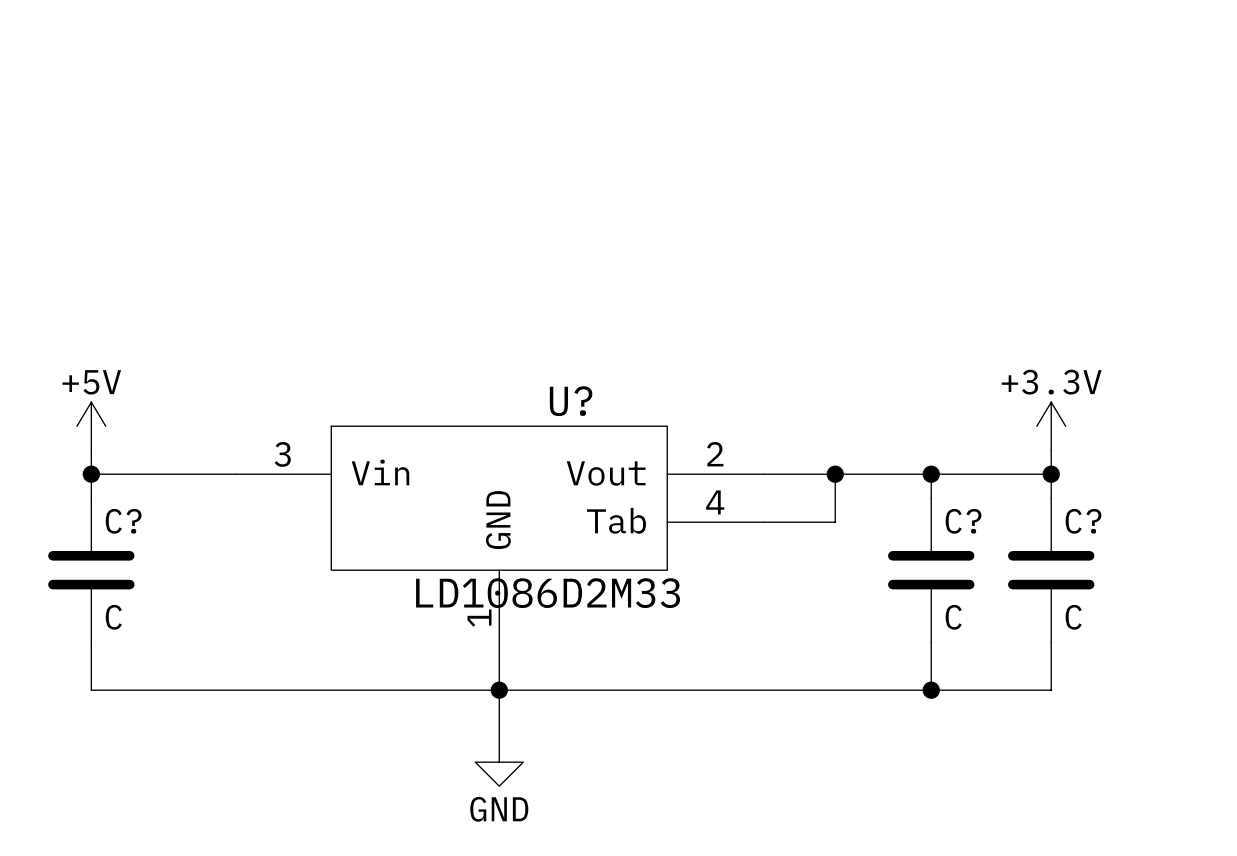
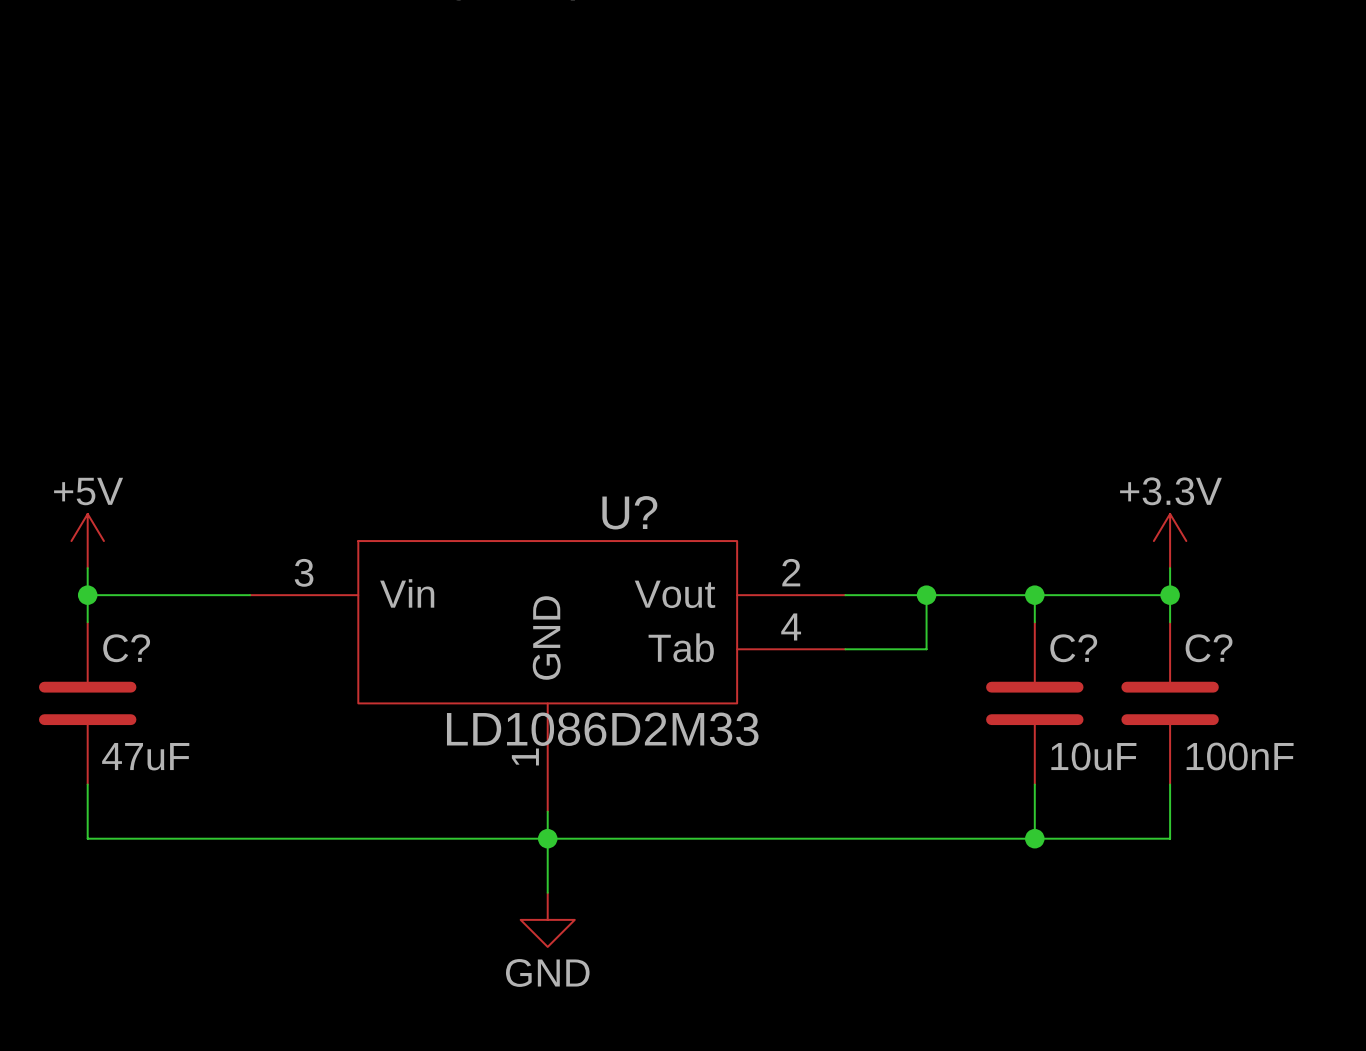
C? value: C (113, 617) -> 47uF (145, 756)
C? value: C (953, 617) -> 10uF (1093, 756)
C? value: C (1073, 617) -> 100nF (1240, 756)

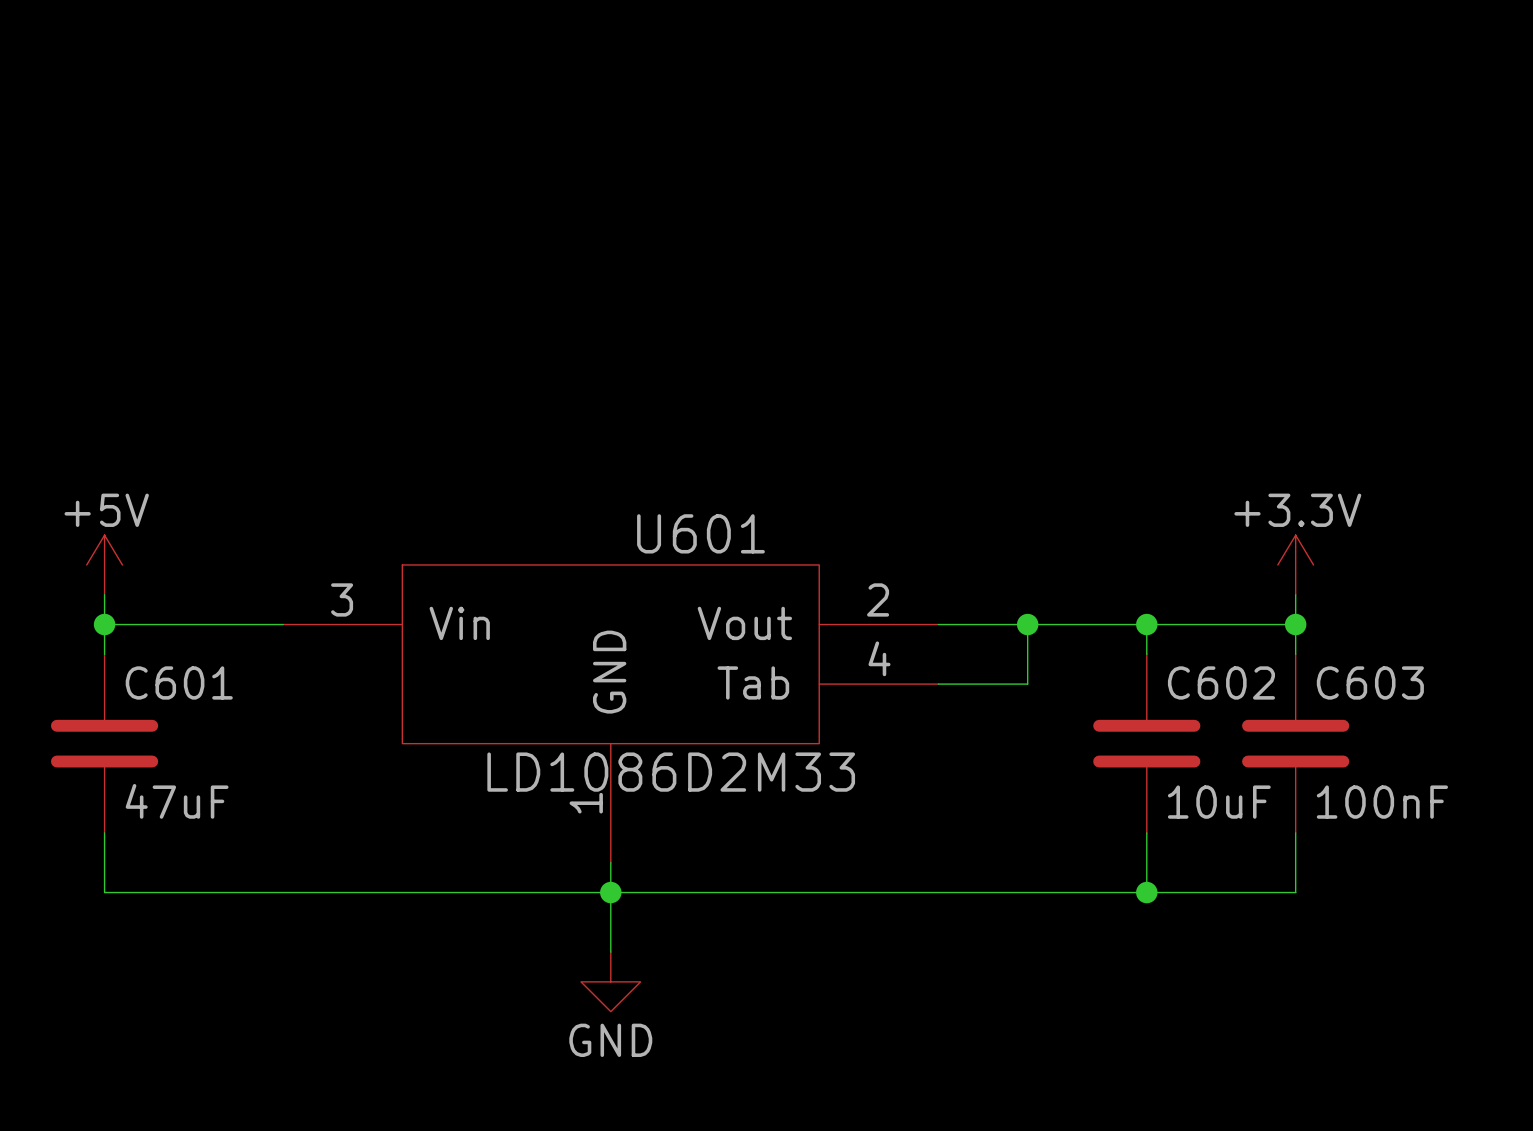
U? name: U? (629, 512) -> U601 (700, 533)
C? name: C? (126, 648) -> C601 (179, 682)
C? name: C? (1073, 648) -> C602 (1221, 682)
C? name: C? (1209, 648) -> C603 (1370, 682)

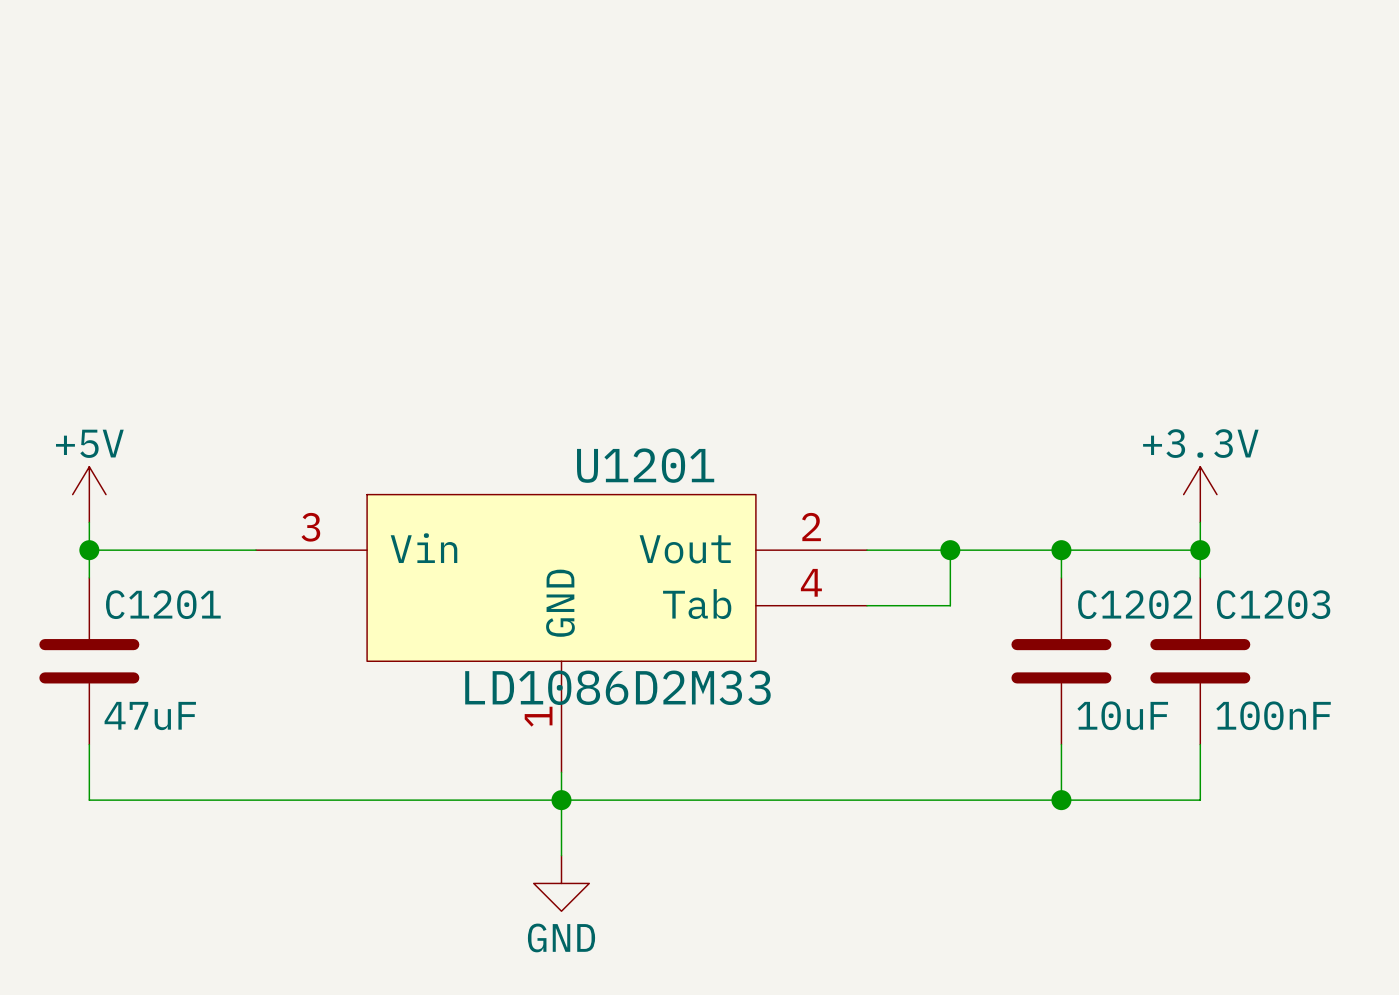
U601 name: U601 (700, 533) -> U1201 (645, 465)
C601 name: C601 (179, 682) -> C1201 (163, 604)
C602 name: C602 (1221, 682) -> C1202 (1135, 604)
C603 name: C603 (1370, 682) -> C1203 (1273, 604)

